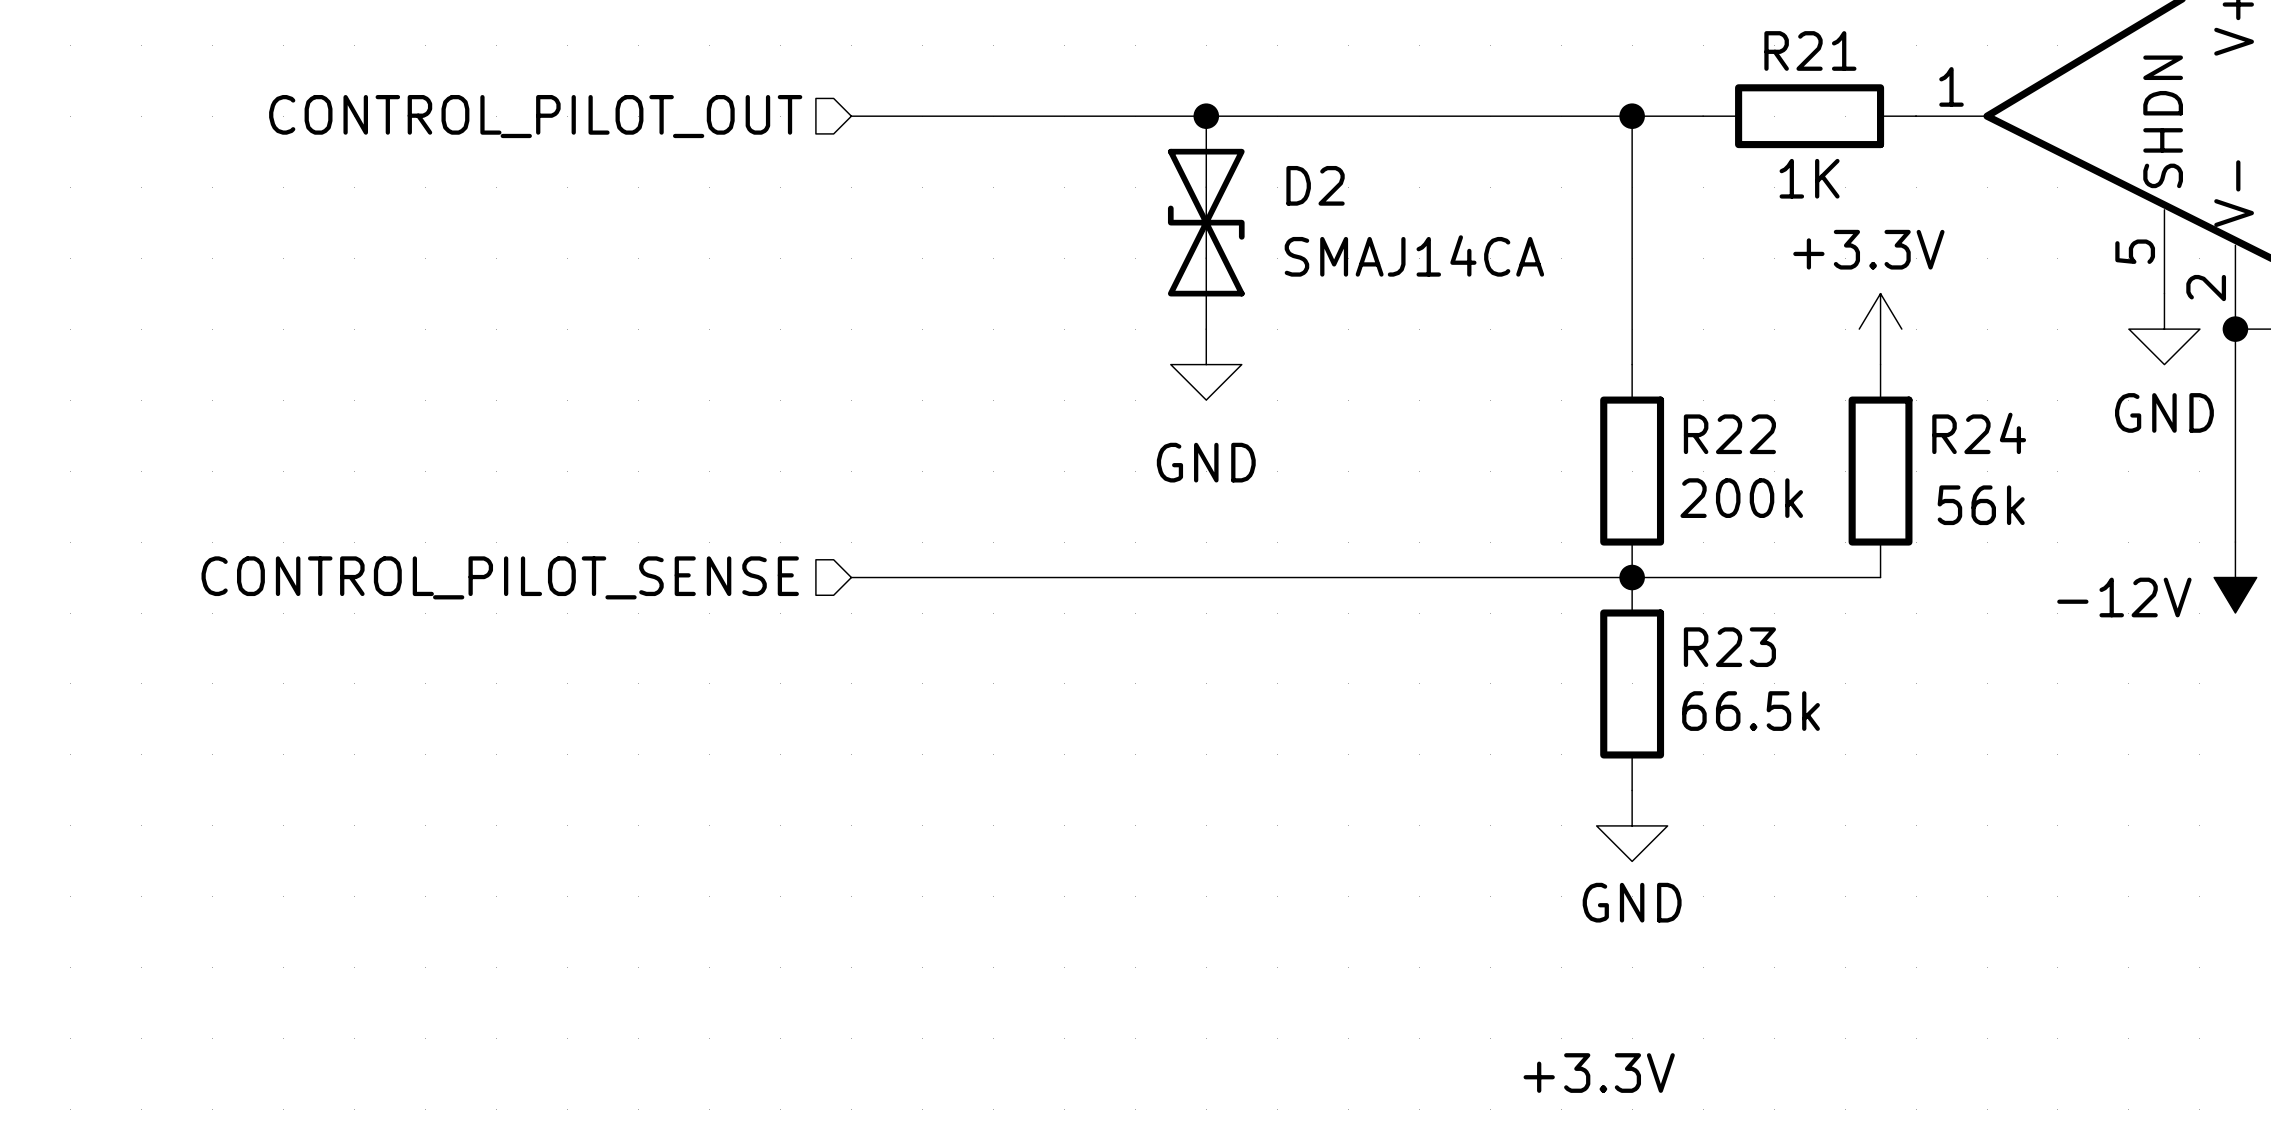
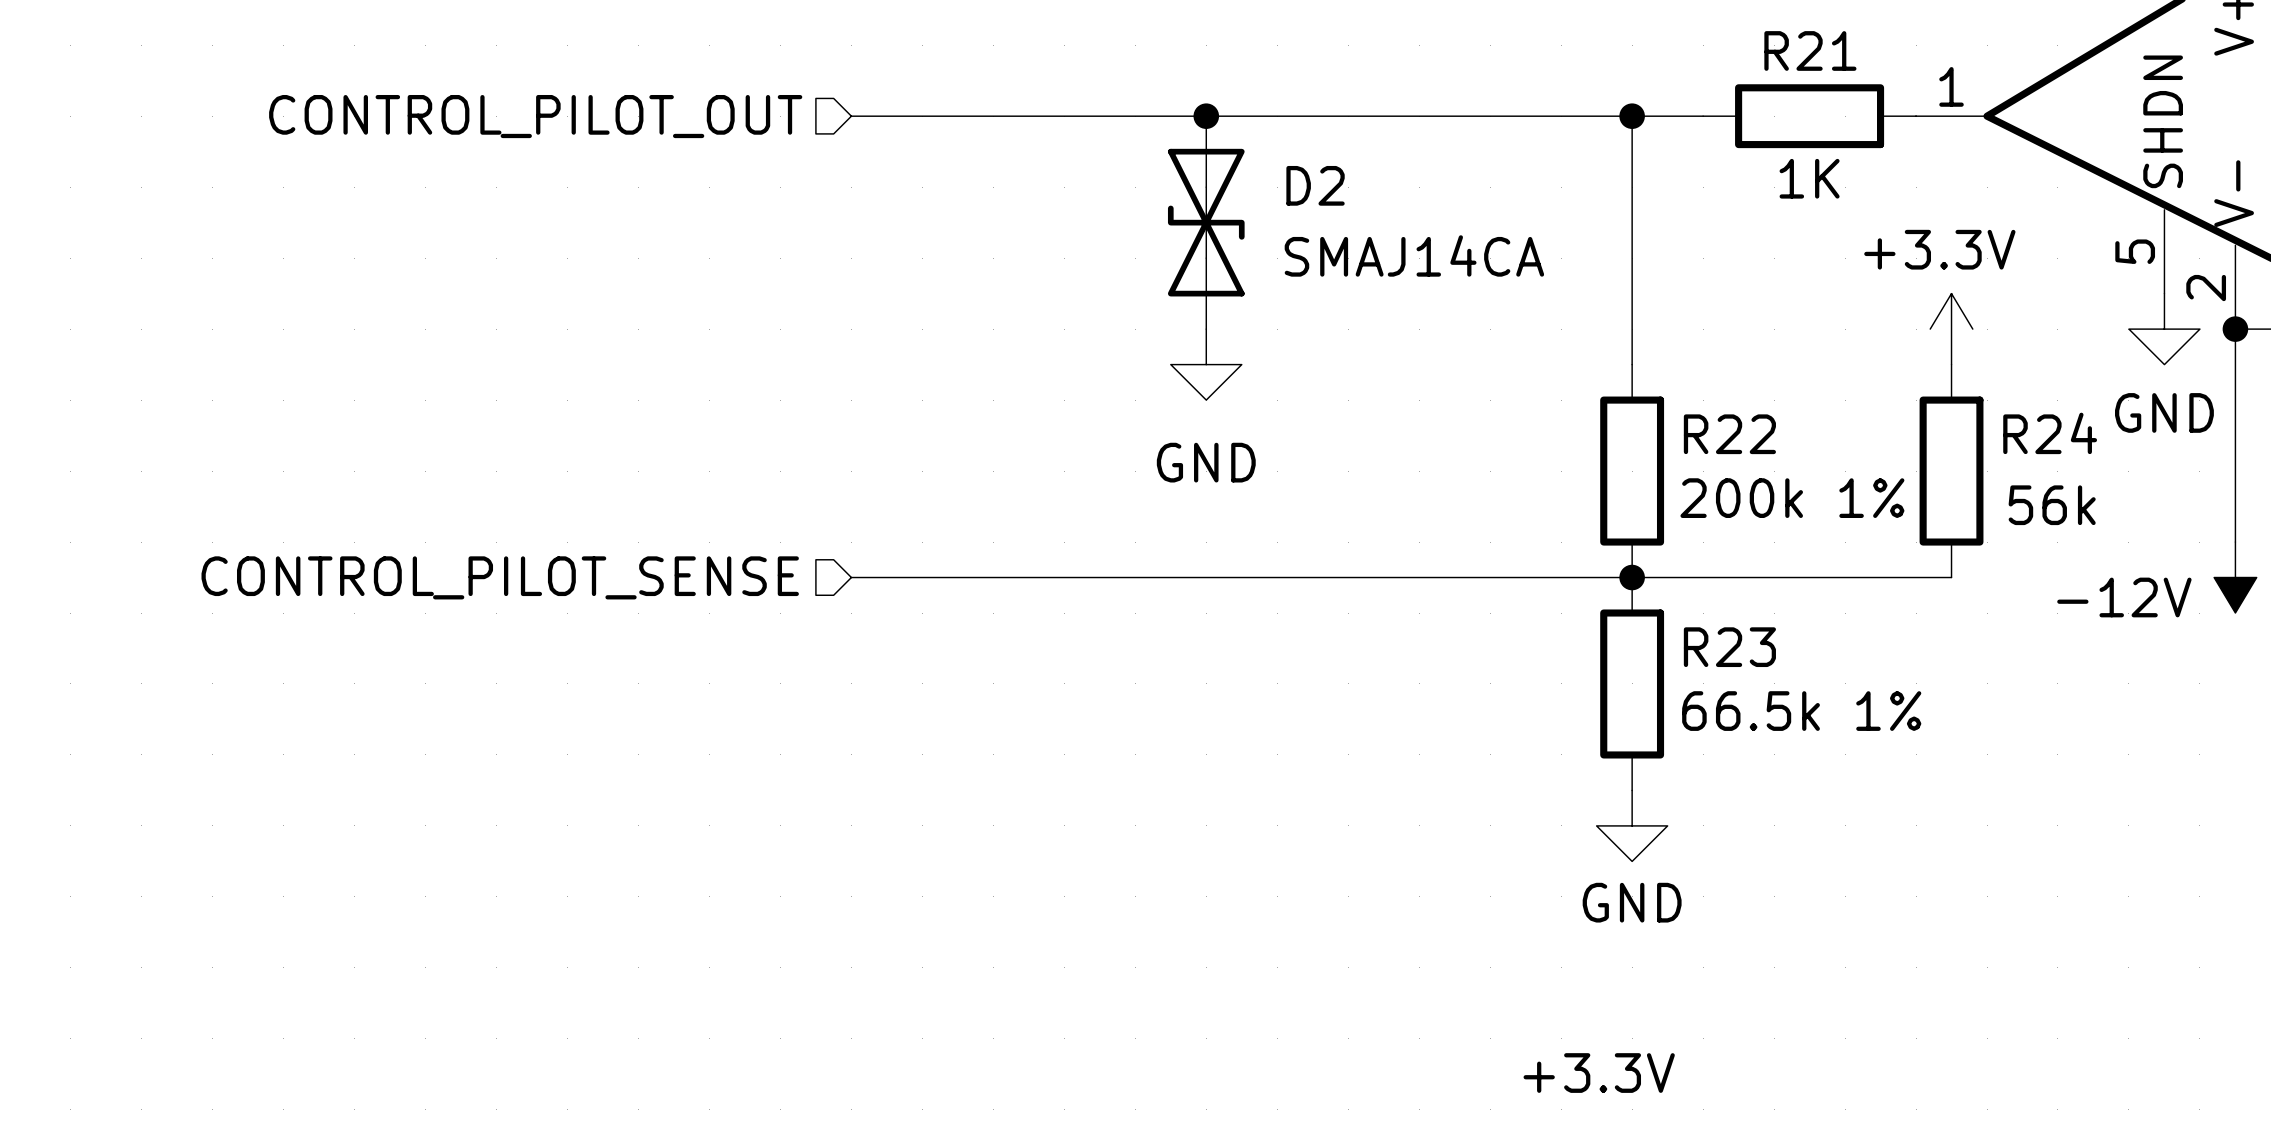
power symbol position: +3.3V (1880, 329) -> +3.3V (1951, 329)
R24 position: (1880, 471) -> (1951, 471)
R22 value: 200k (1741, 498) -> 200k 1% (1792, 498)
wire: none -> (1880, 577) (1951, 577)
R23 value: 66.5k (1751, 711) -> 66.5k 1% (1801, 711)

